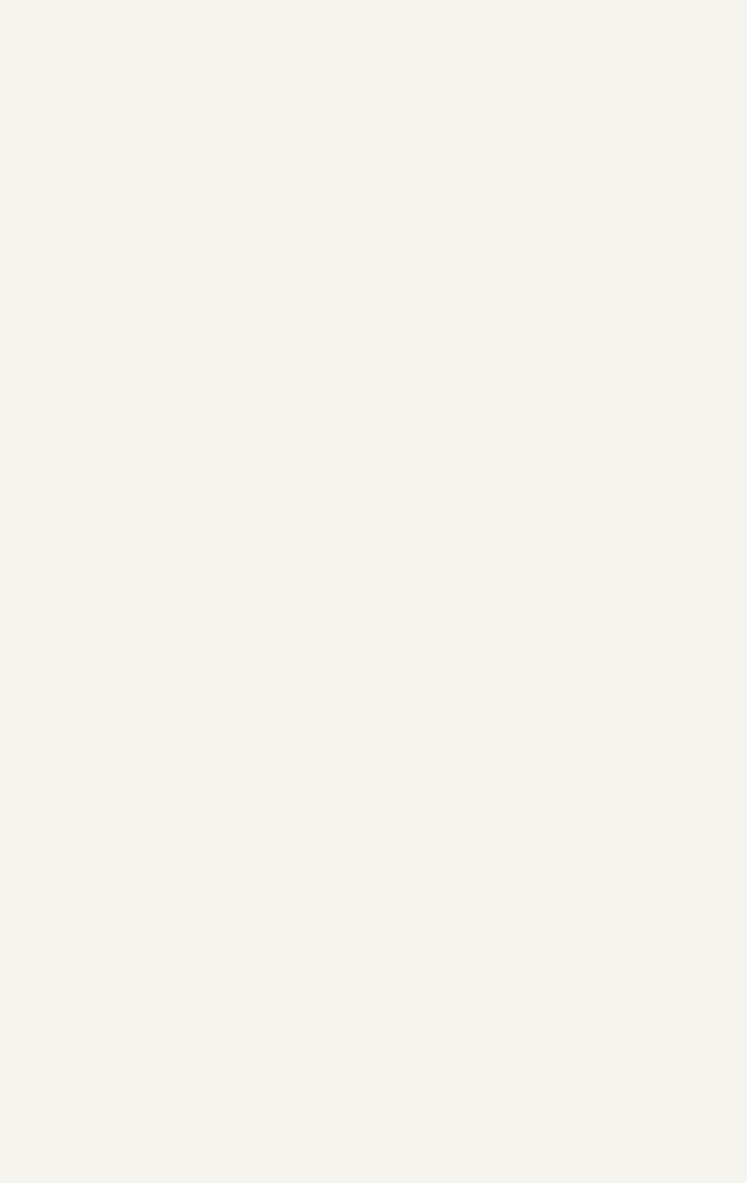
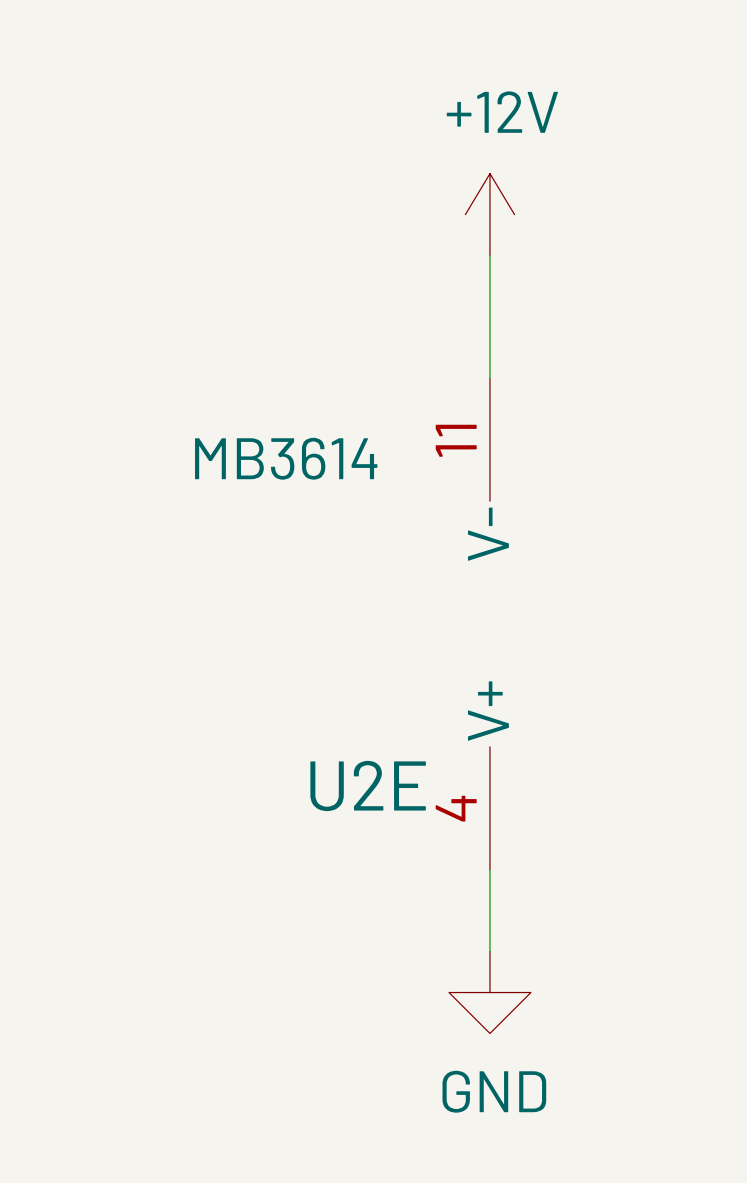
power symbol: none -> +12V (489, 214)
wire: none -> (489, 255) (489, 378)
U2E: none -> MB3614 (489, 624)
wire: none -> (489, 869) (489, 951)
power symbol: none -> GND (489, 992)

